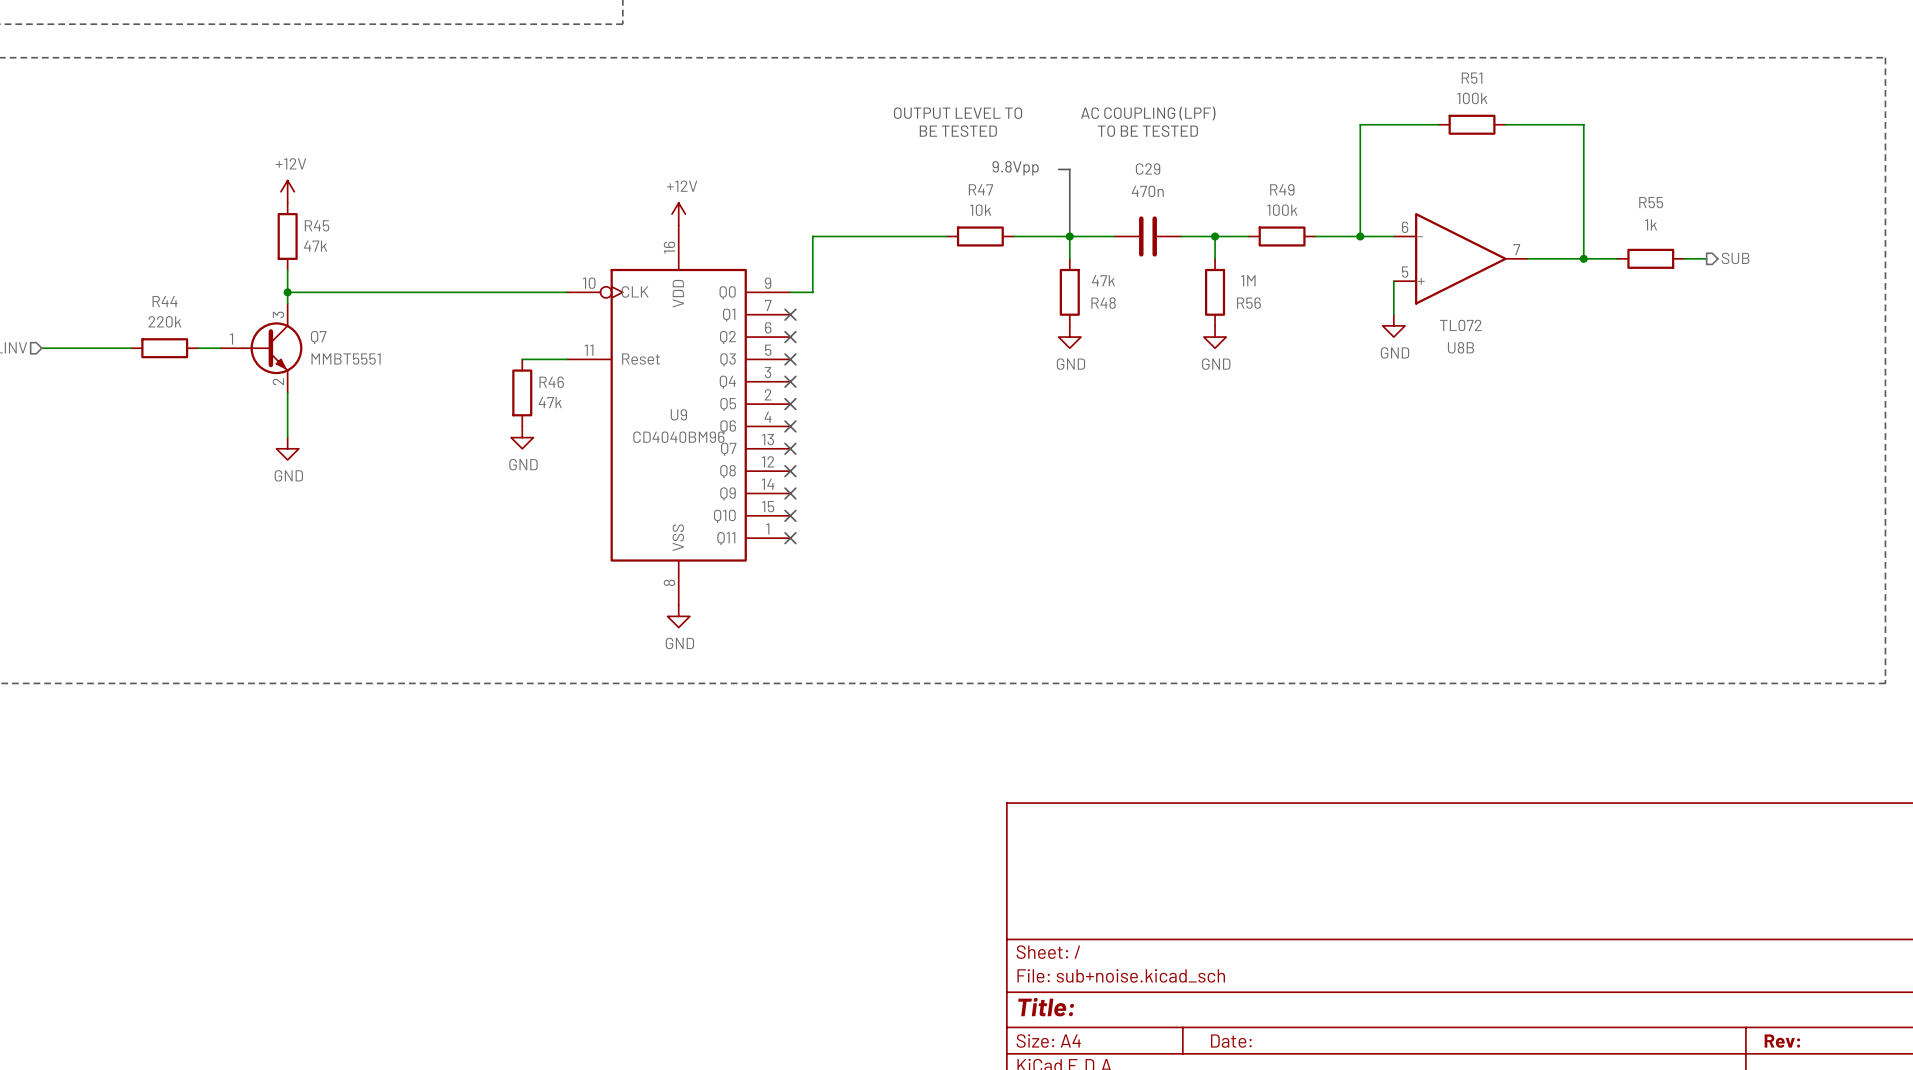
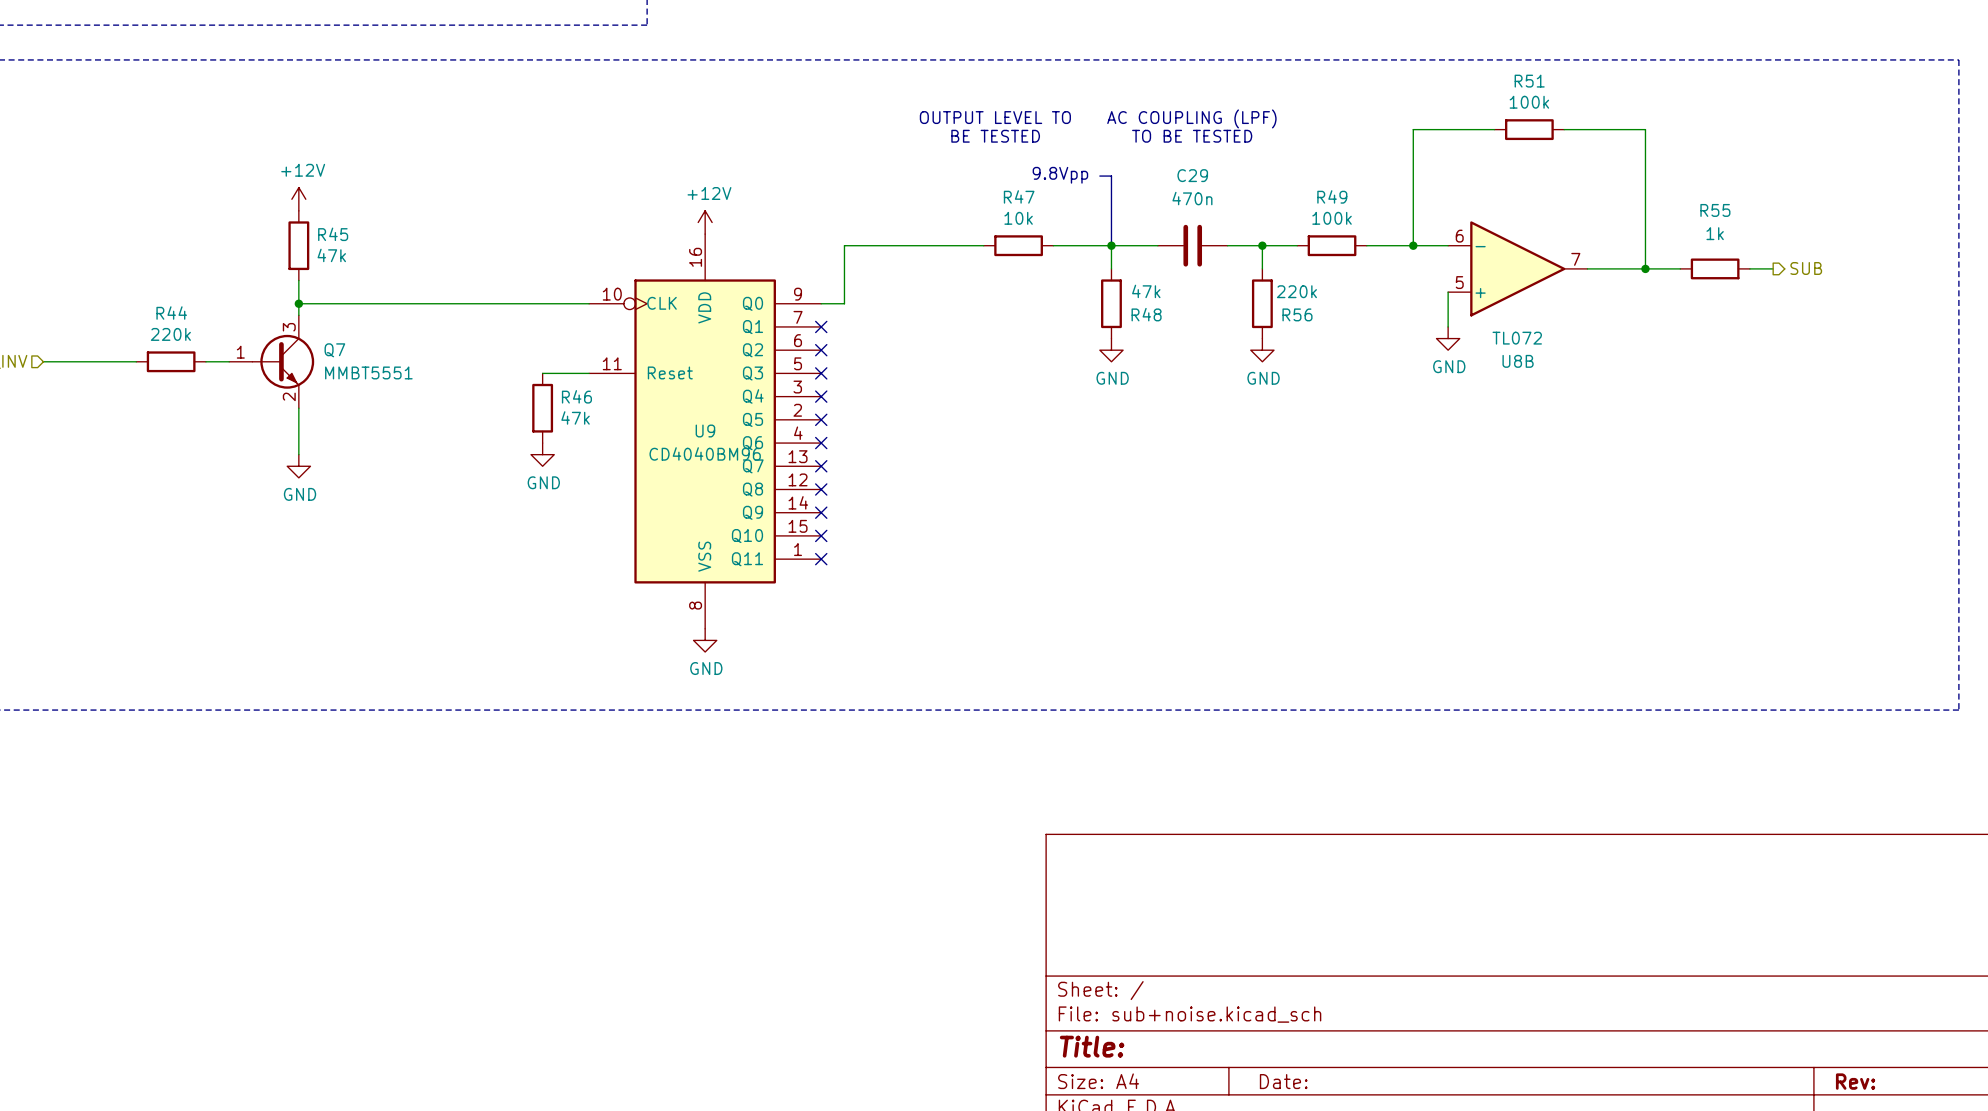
R56 value: 1M (1248, 280) -> 220k (1296, 291)

